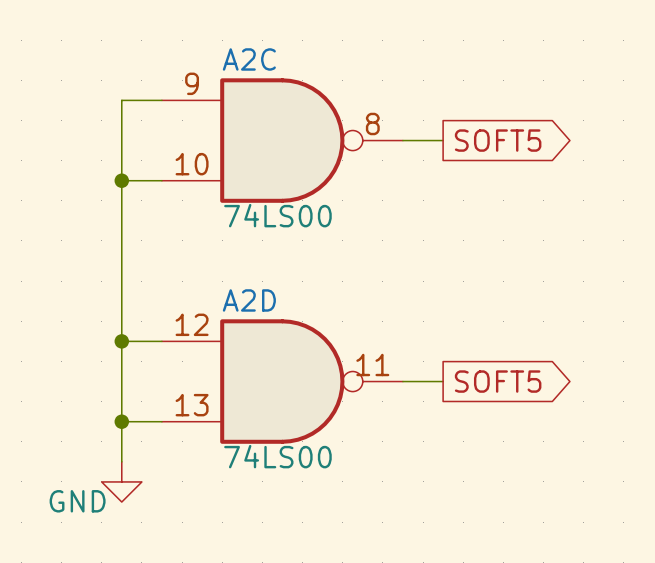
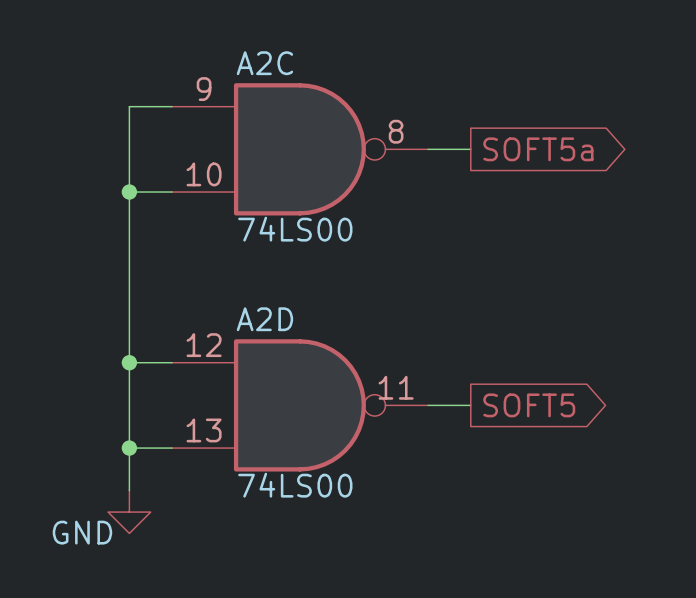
global label: SOFT5 (498, 140) -> SOFT5a (538, 149)

